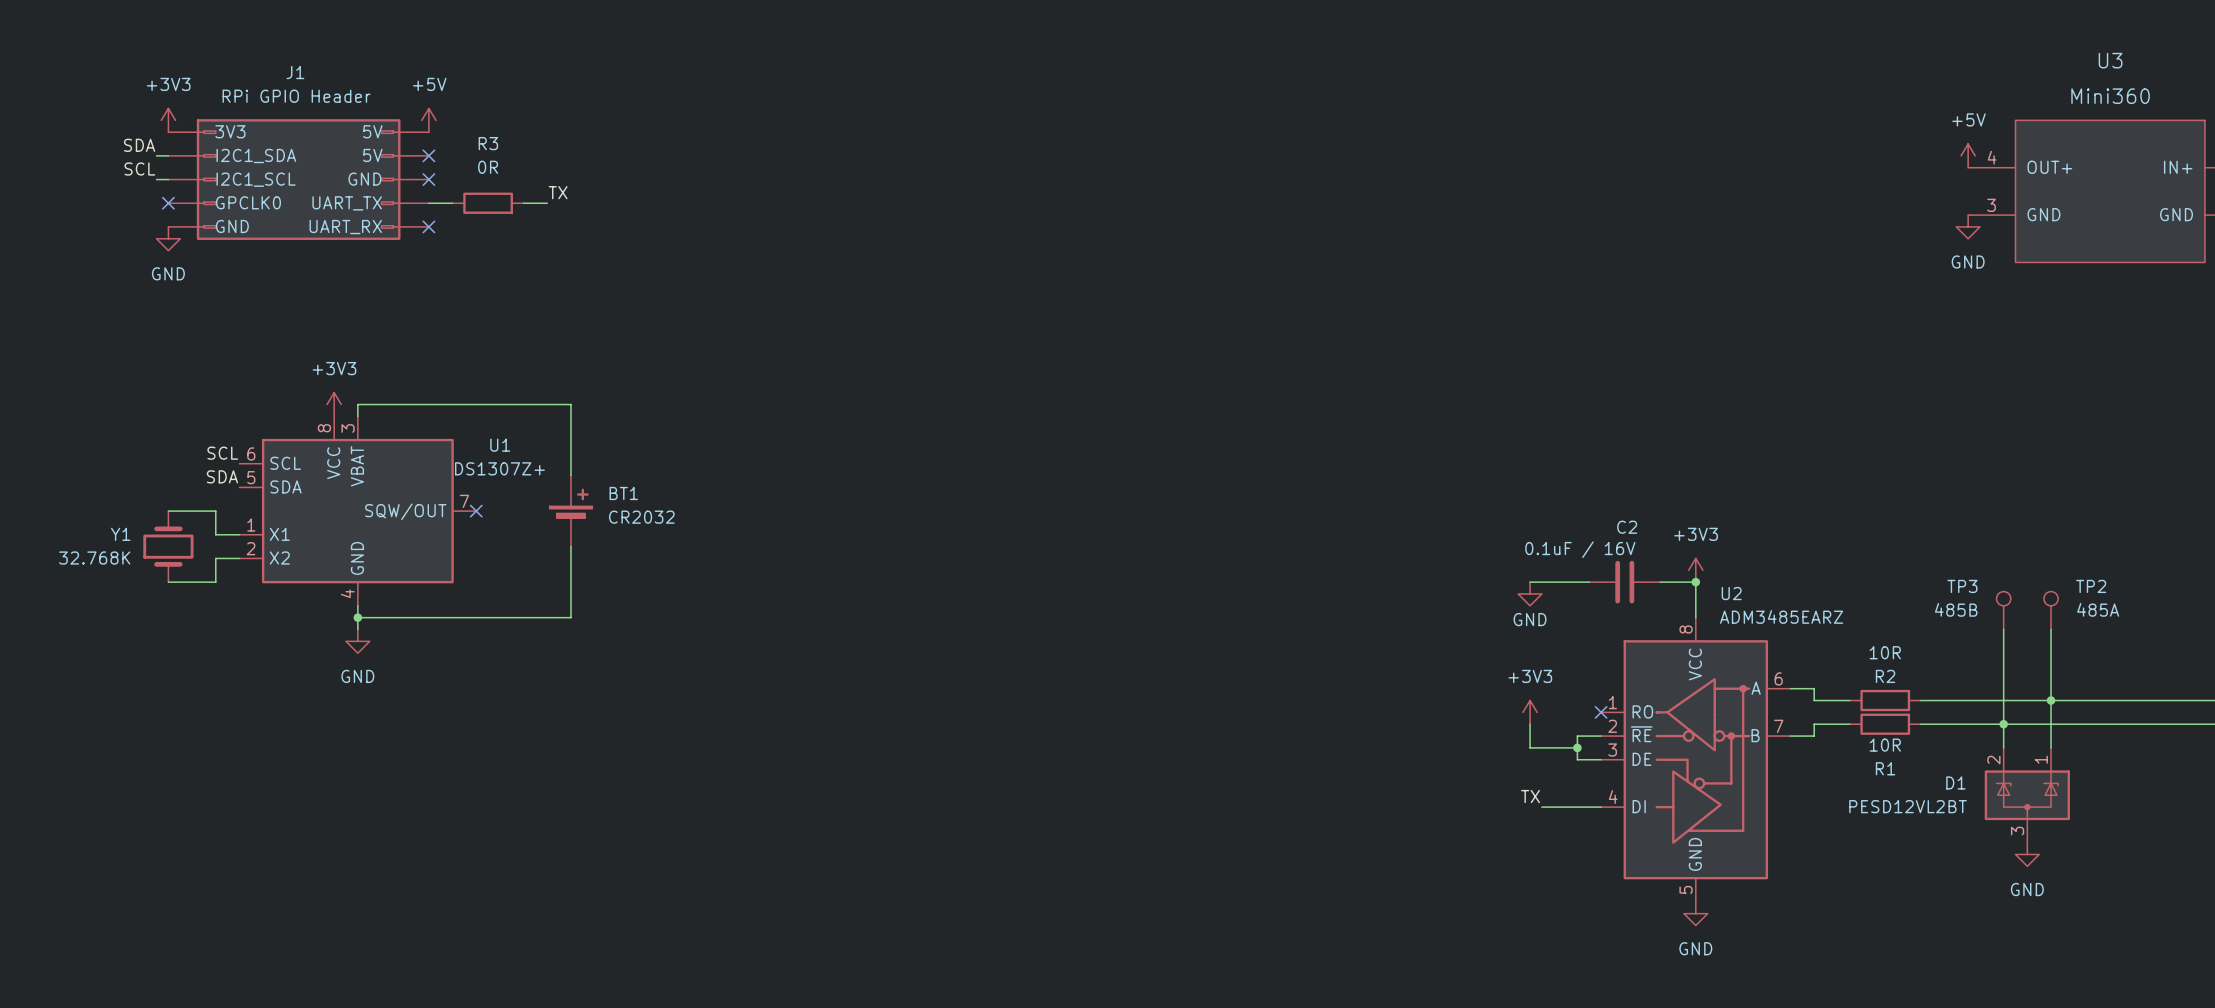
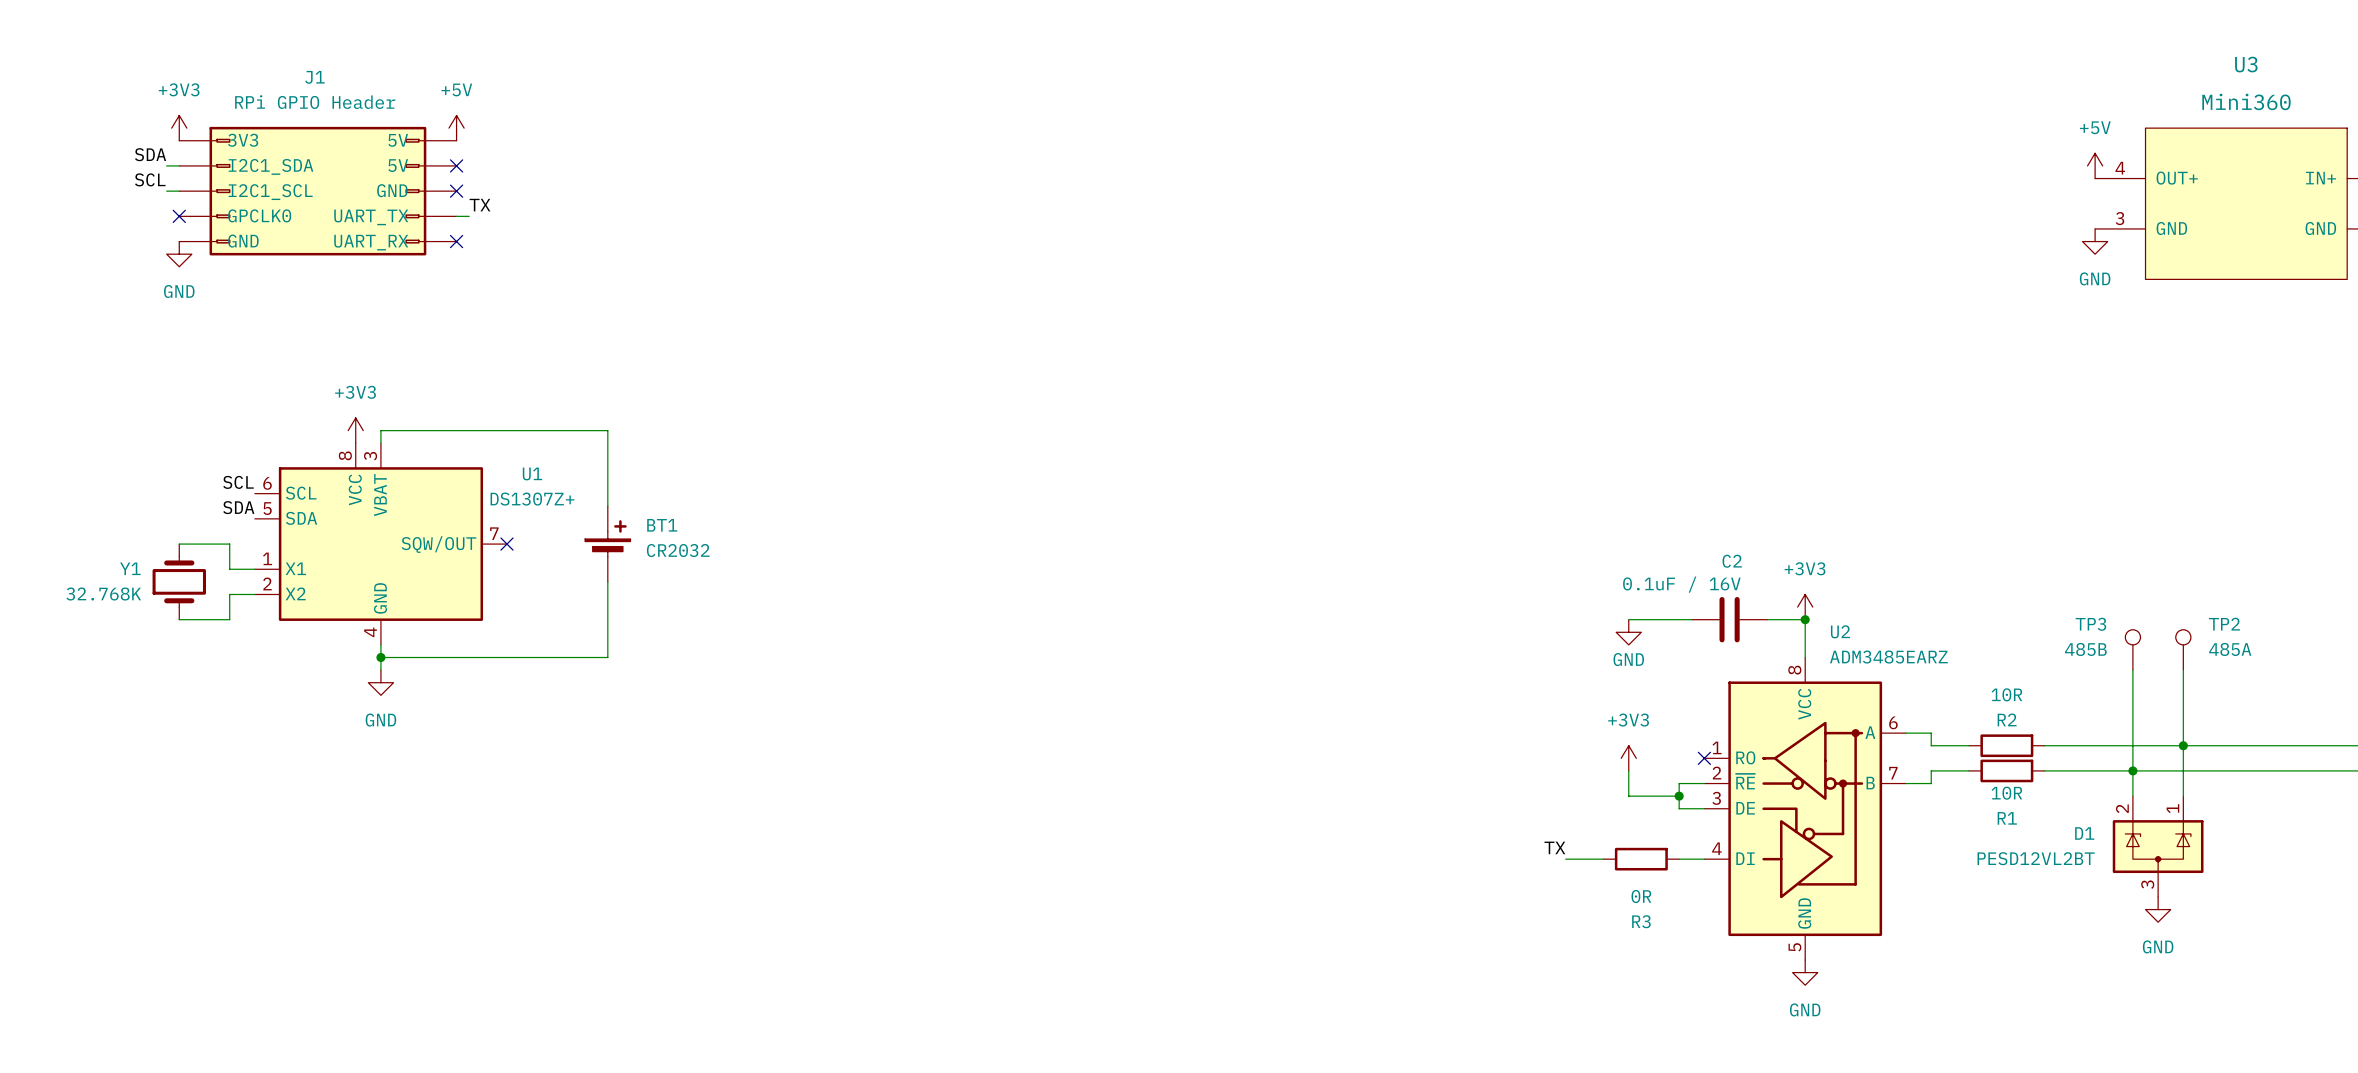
R3 name position: R3 (488, 143) -> R3 (1641, 921)
R3 value position: 0R (488, 167) -> 0R (1641, 896)
label position: TX (558, 192) -> TX (480, 205)
wire: (440, 203) (452, 203) -> none
R3 position: (488, 203) -> (1641, 859)
wire: (523, 203) (547, 203) -> none
label position: TX (1530, 796) -> TX (1554, 847)
wire: (1541, 807) (1577, 807) -> (1565, 859) (1603, 859)

